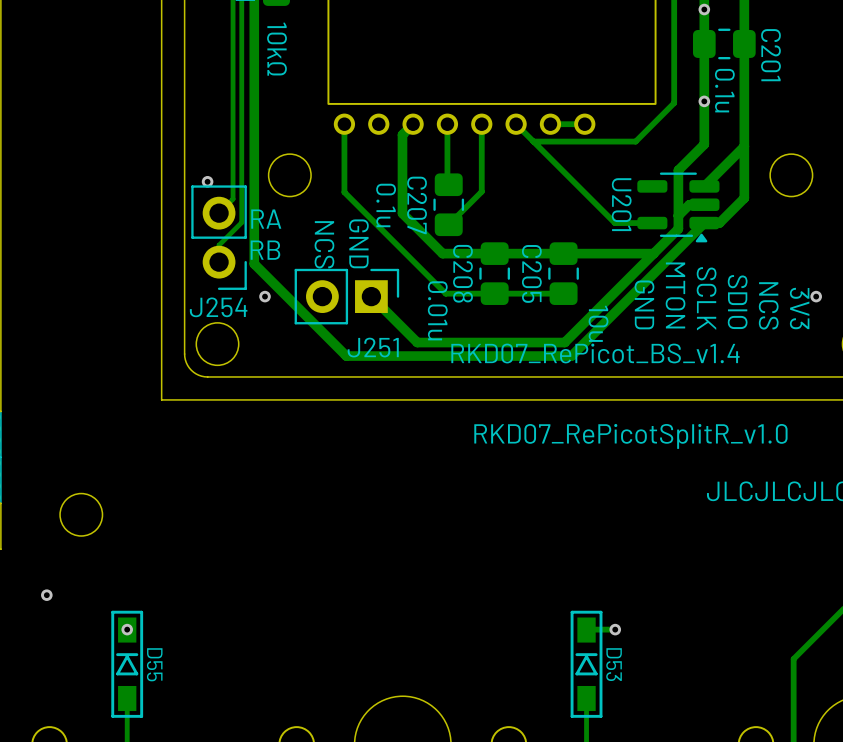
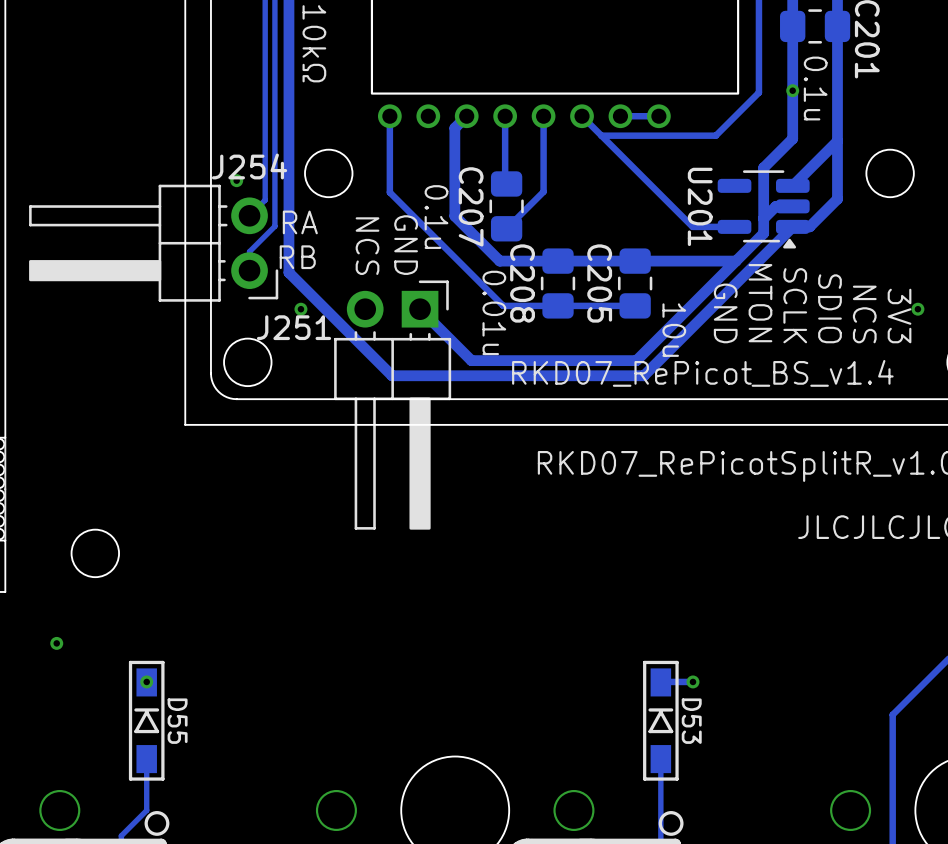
J254 footprint: [191, 185, 247, 290] -> [29, 184, 279, 302]
J251 footprint: [294, 268, 400, 325] -> [334, 280, 452, 530]
J254 name position: J254 (218, 307) -> J254 (249, 166)
J251 name position: J251 (373, 347) -> J251 (294, 327)

